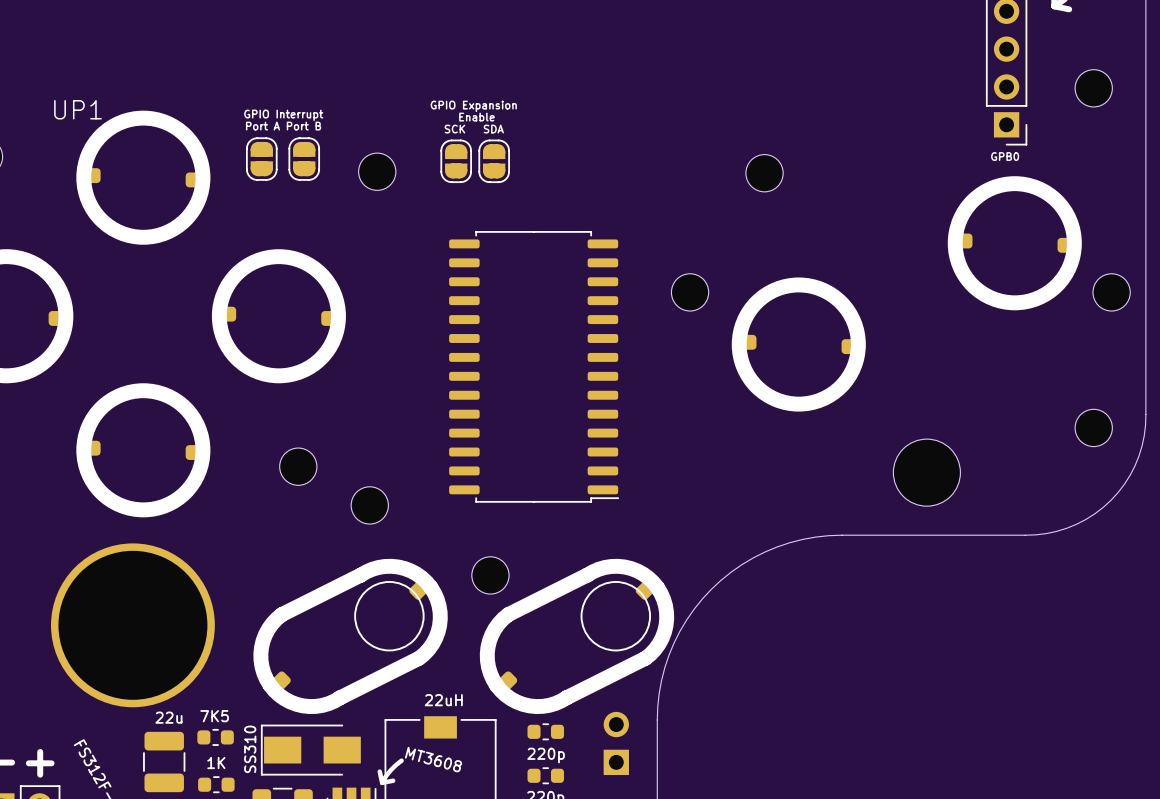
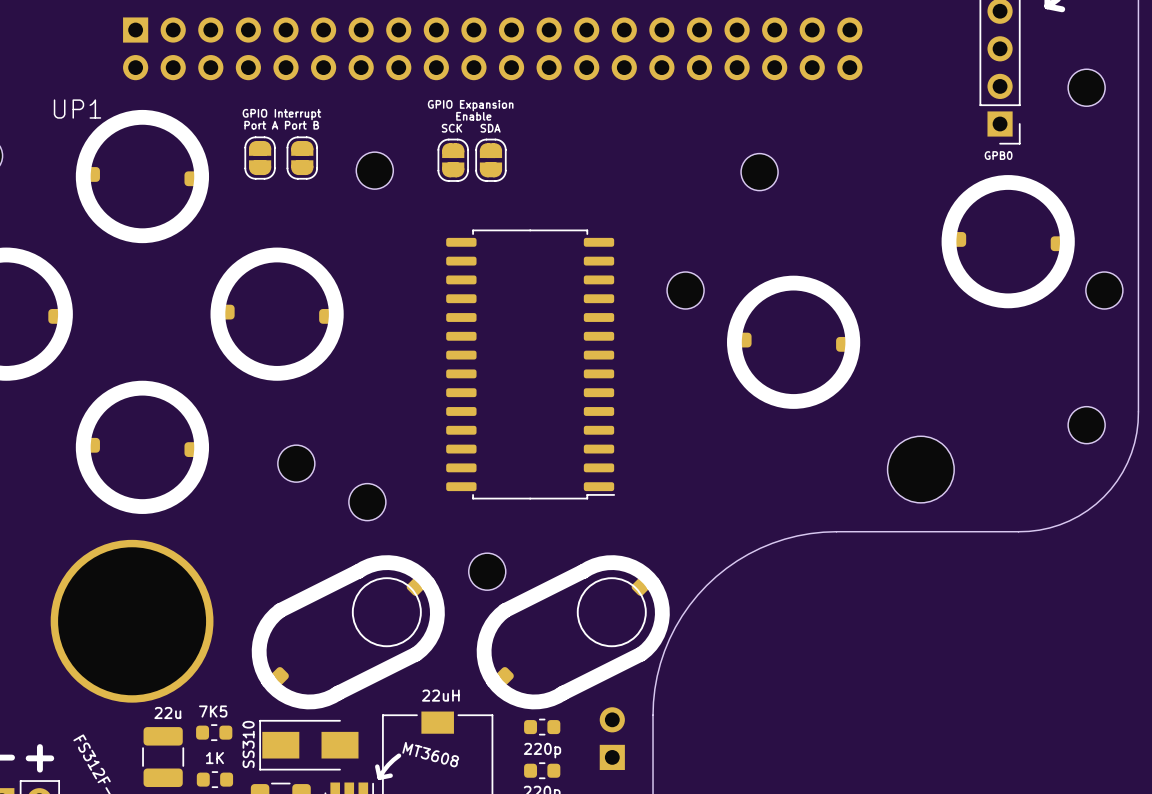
part: none -> (492, 48)

